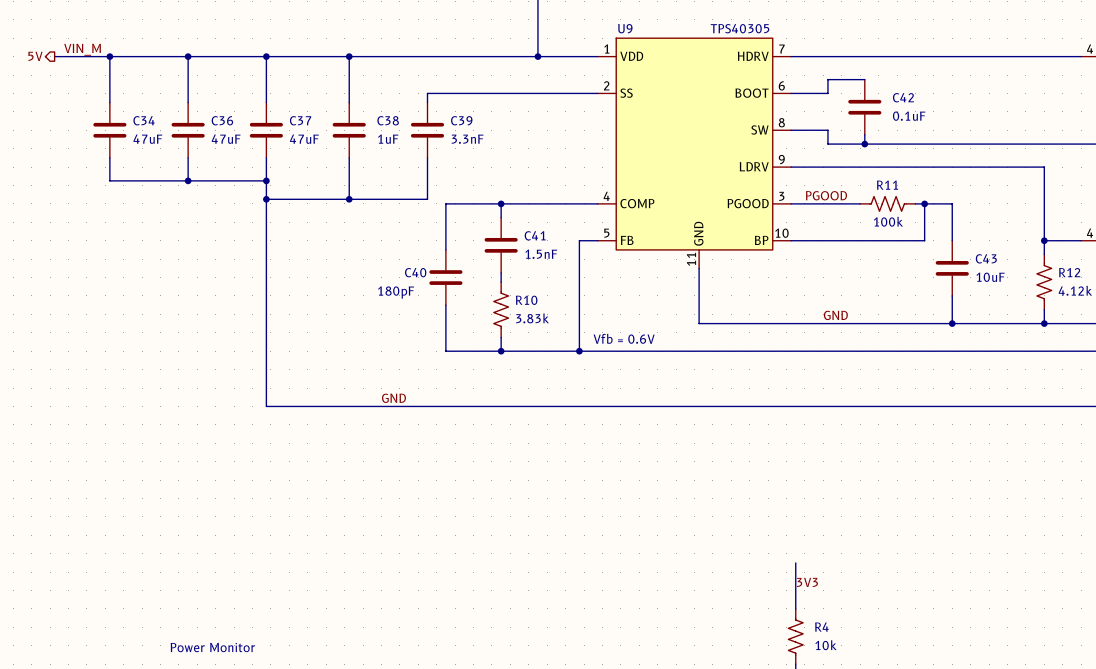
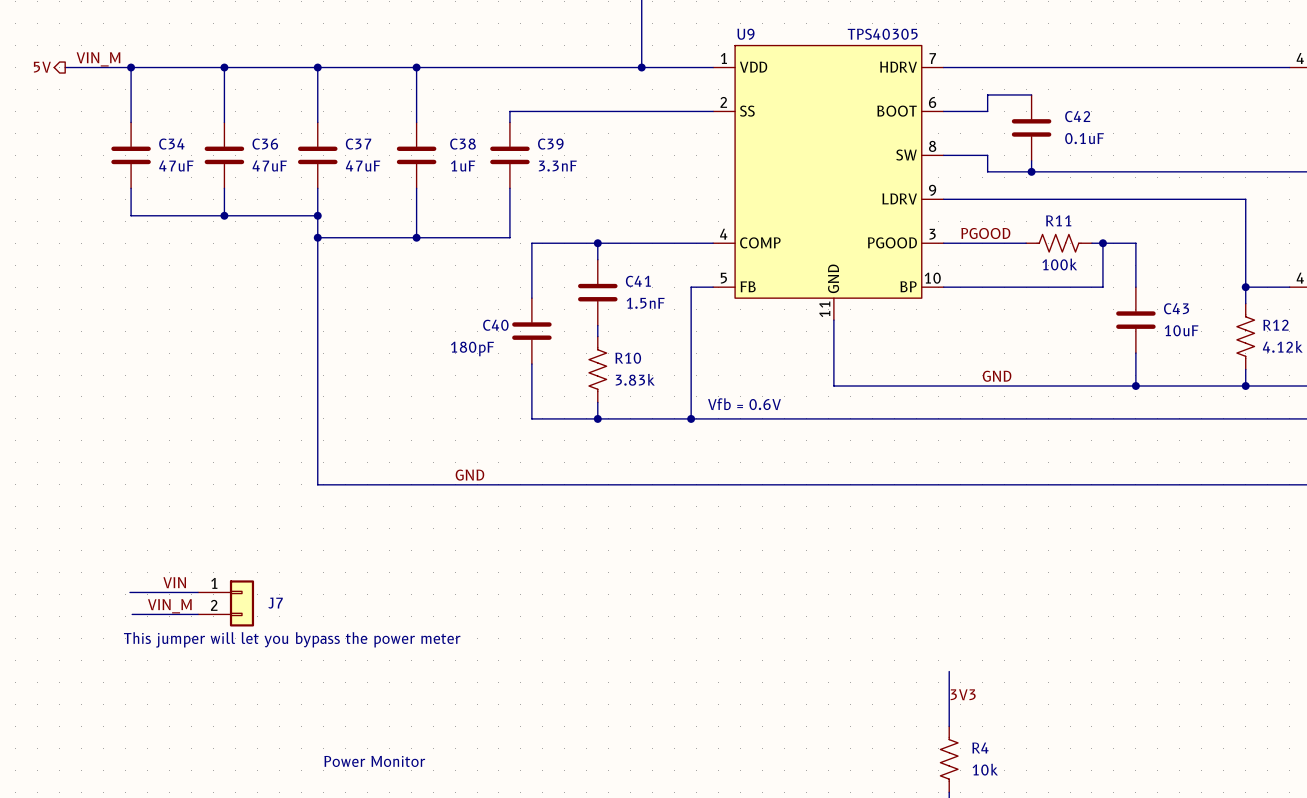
label: none -> VIN (174, 582)
wire: none -> (129, 592) (198, 592)
J7: none -> (226, 603)
label: none -> VIN_M (169, 606)
wire: none -> (132, 614) (198, 614)
text: none -> This jumper will let you bypass the power meter (292, 639)
text position: Power Monitor (212, 647) -> Power Monitor (374, 761)

